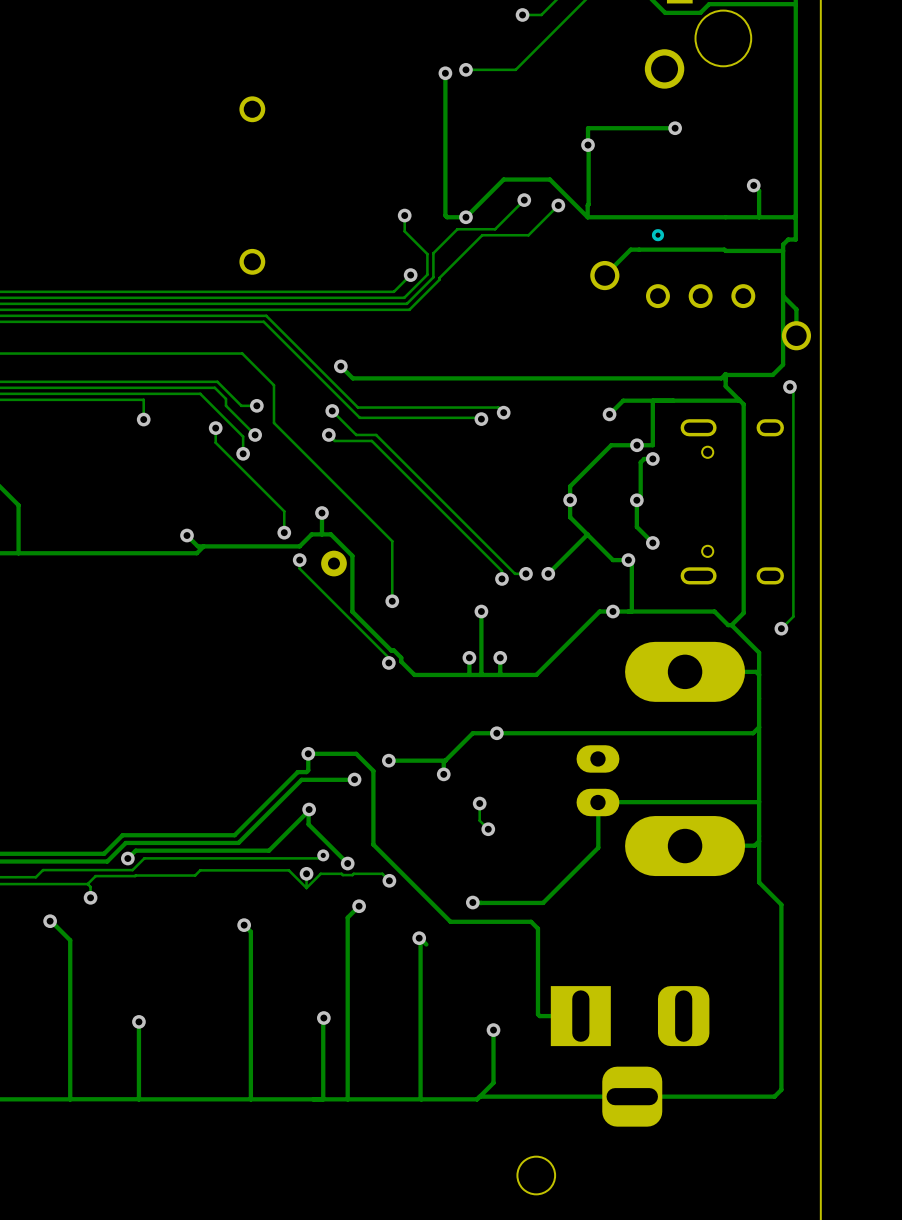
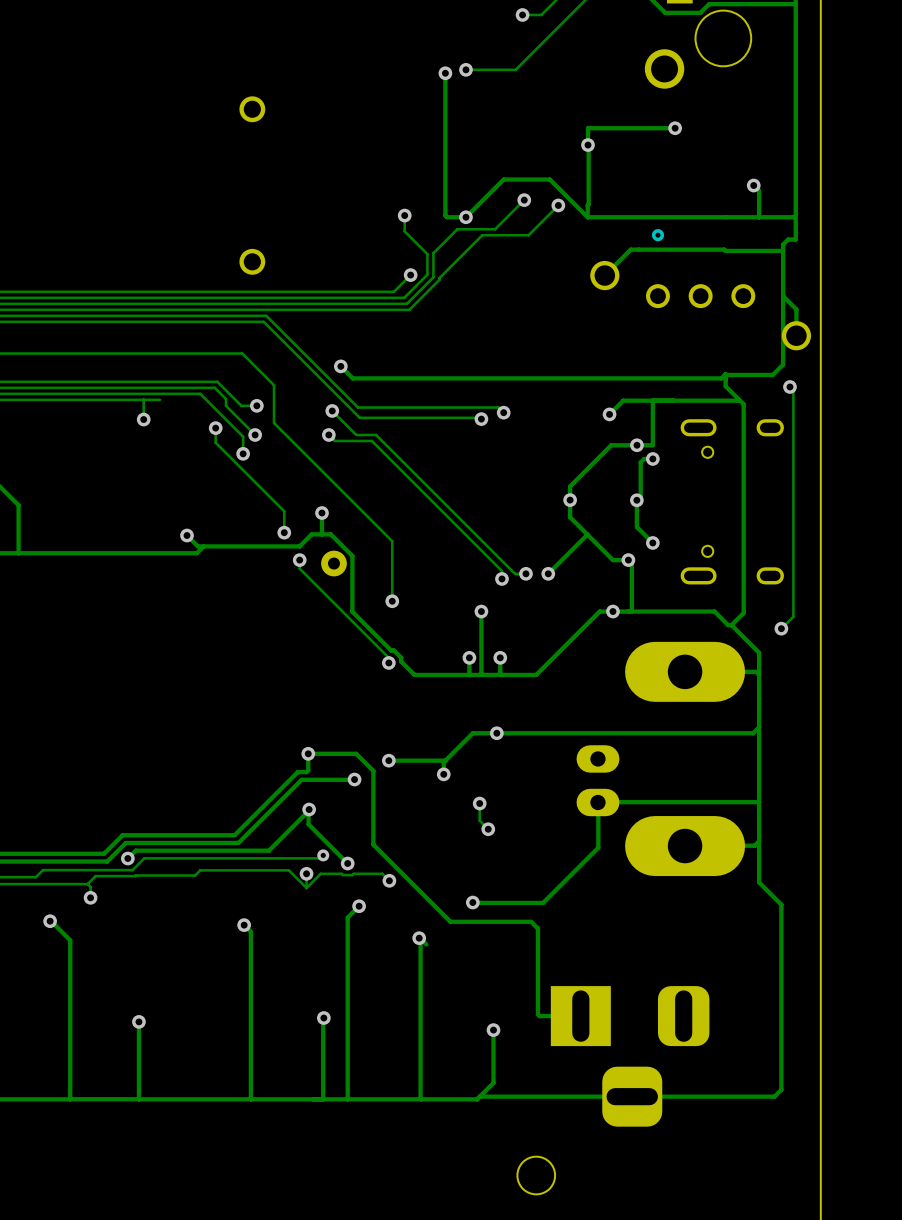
track: none -> (160, 399) (143, 399)

